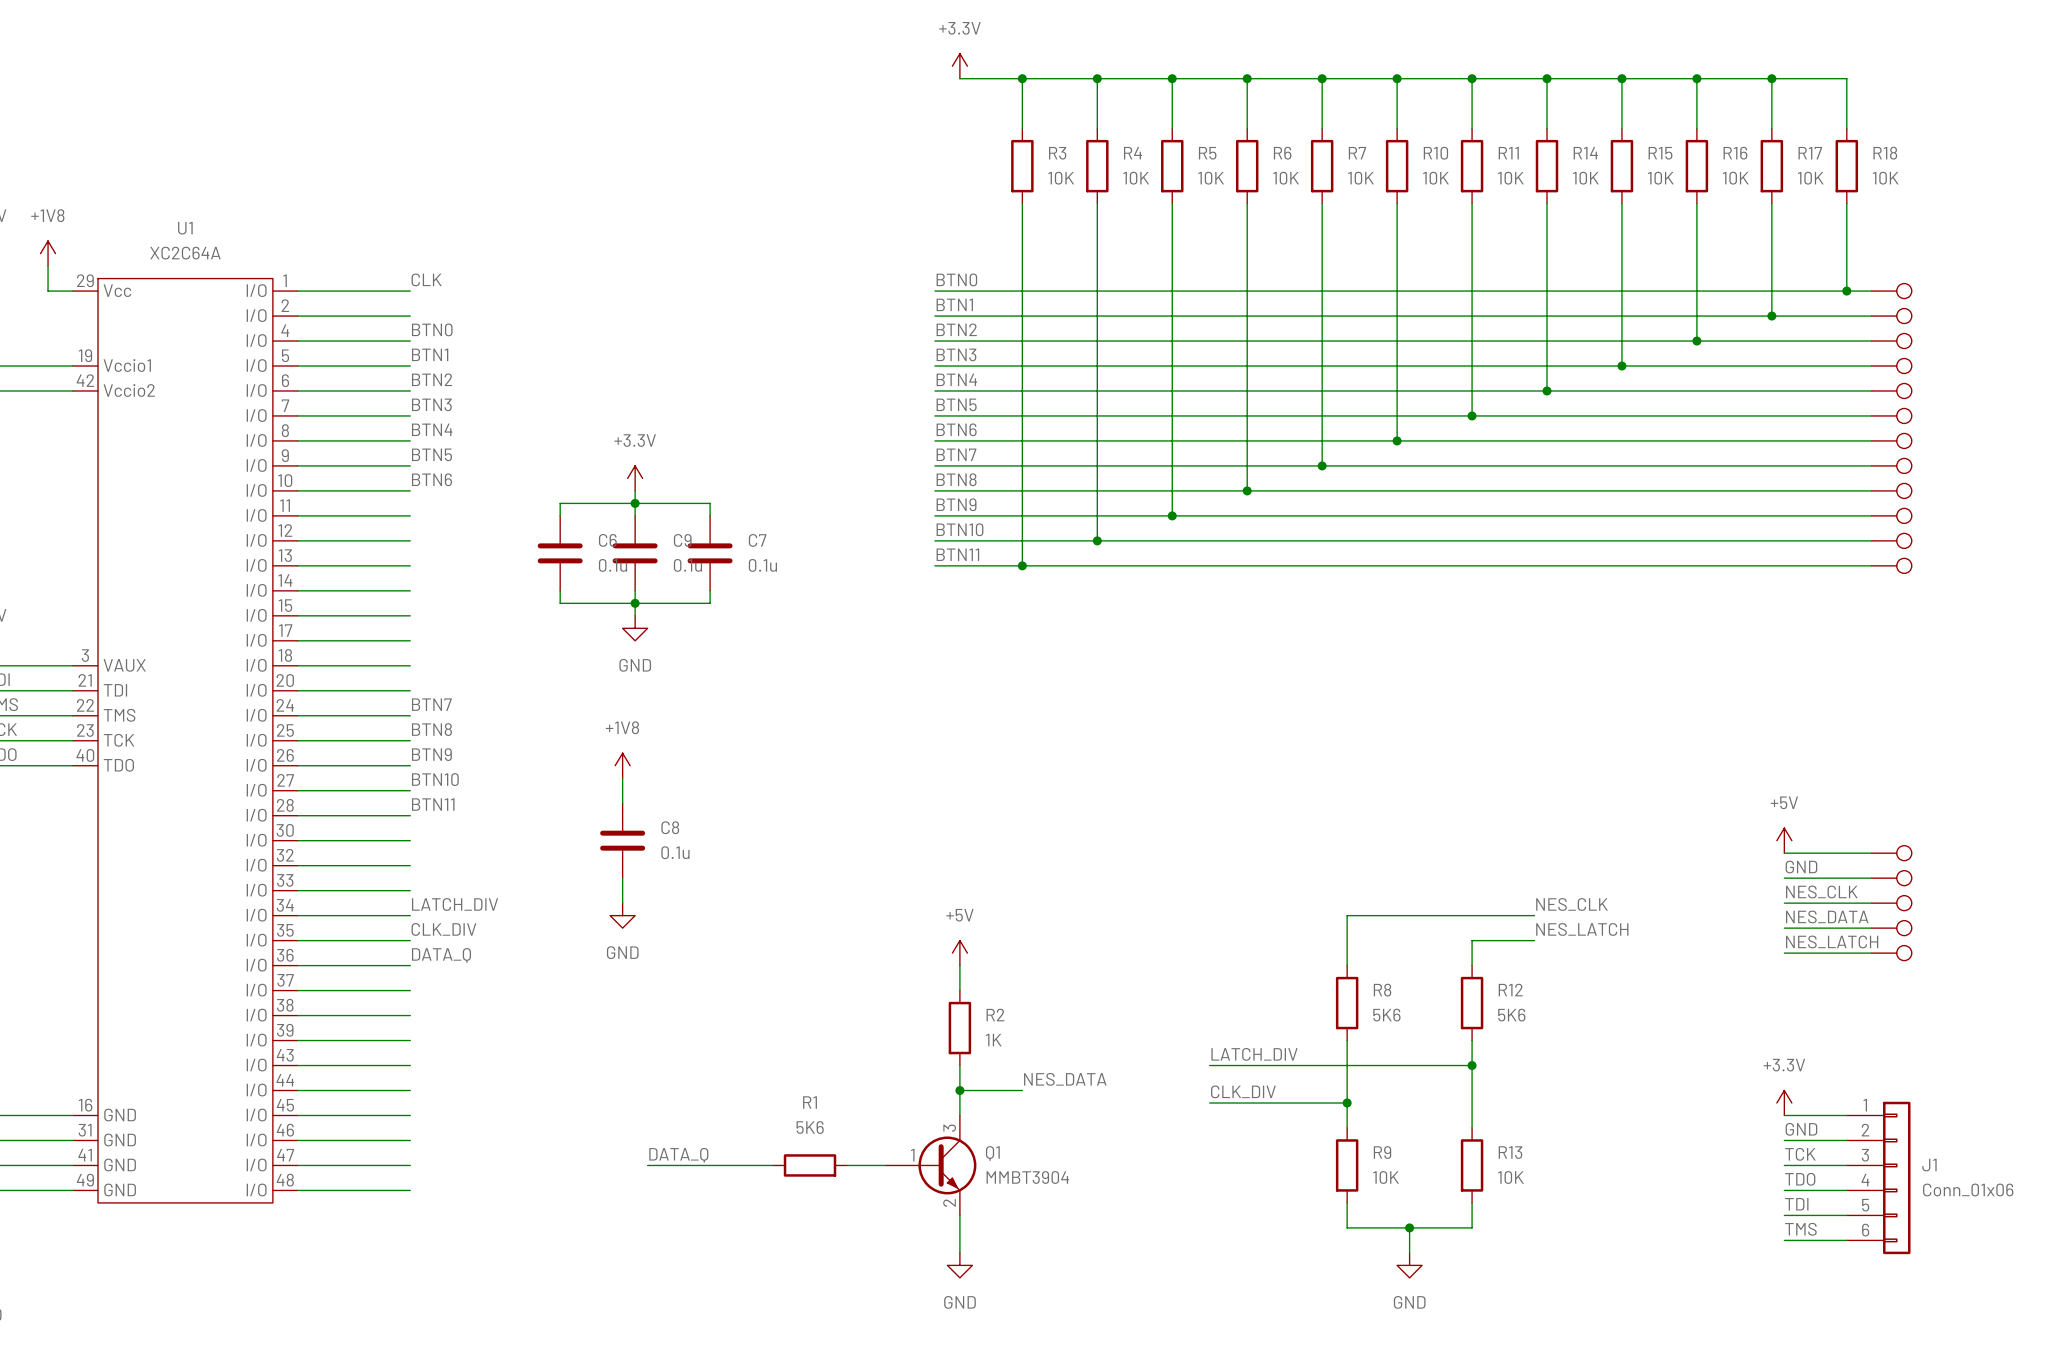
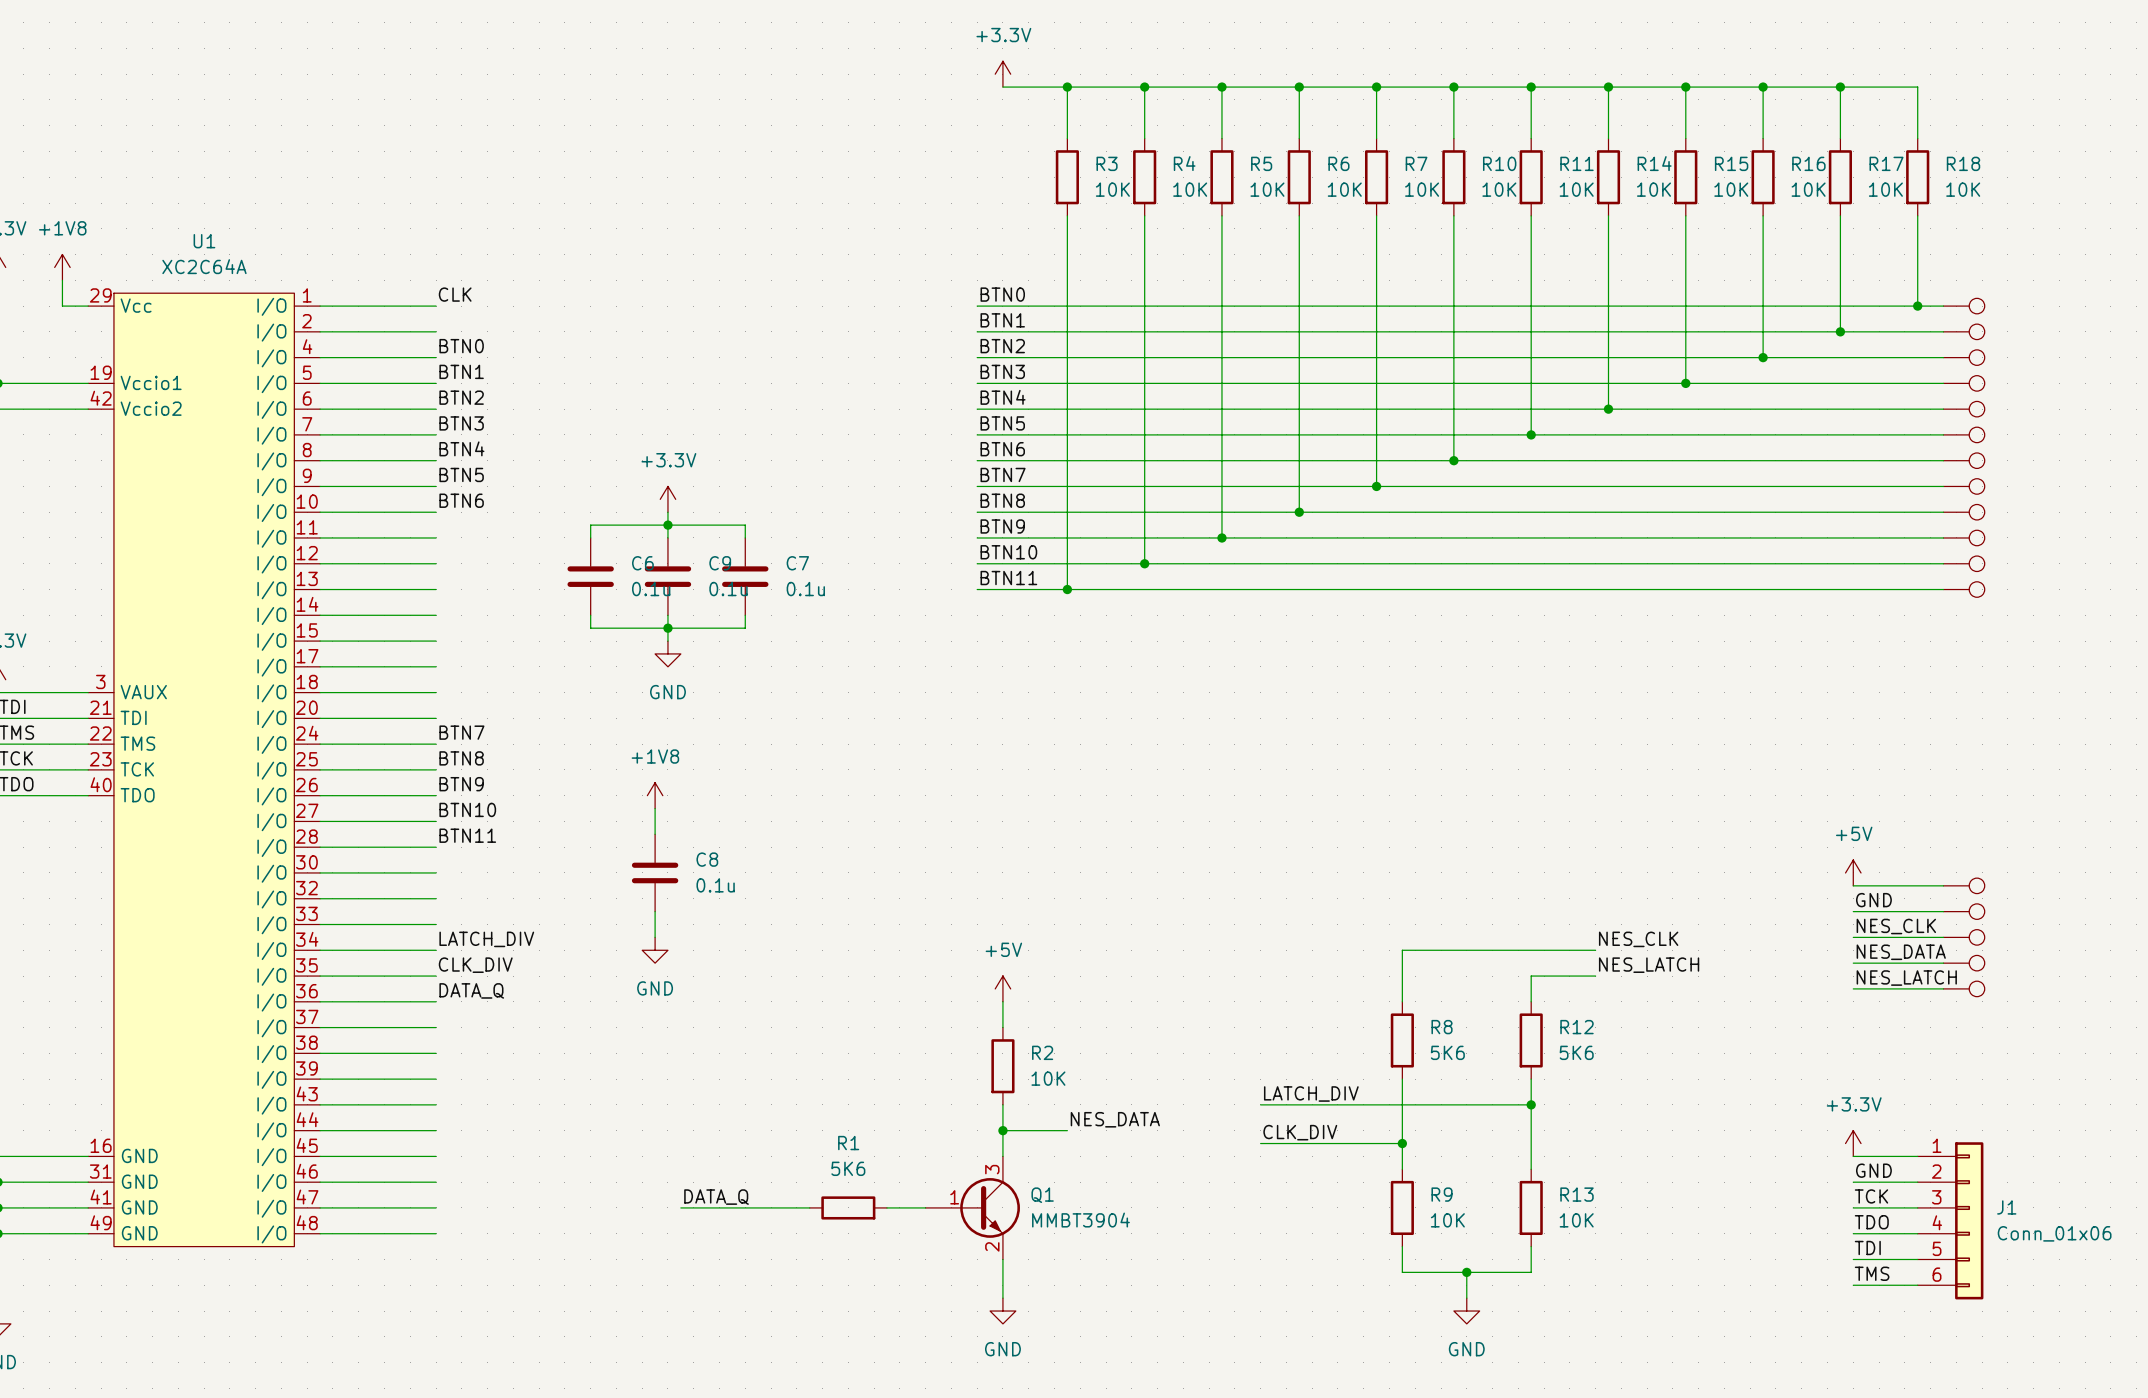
R2 value: 1K (993, 1040) -> 10K (1048, 1078)

